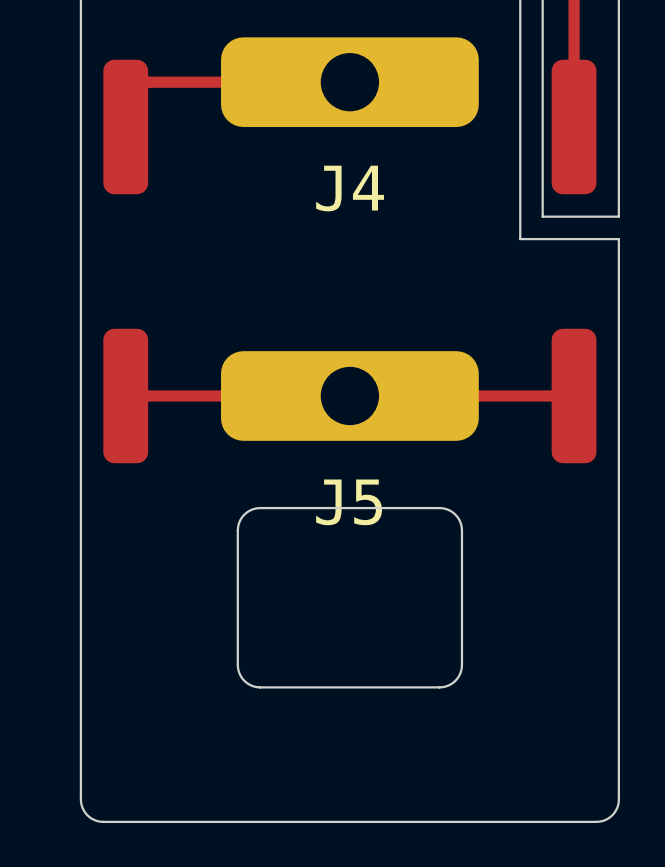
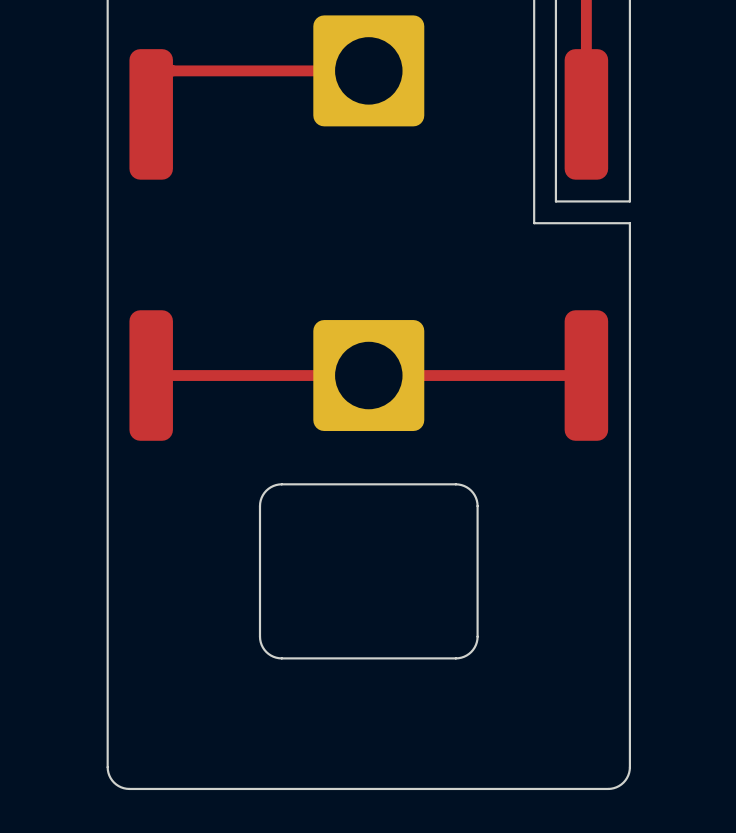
J4: (349, 82) -> none
part: none -> (368, 70)
J5: (349, 395) -> none
part: none -> (368, 375)

